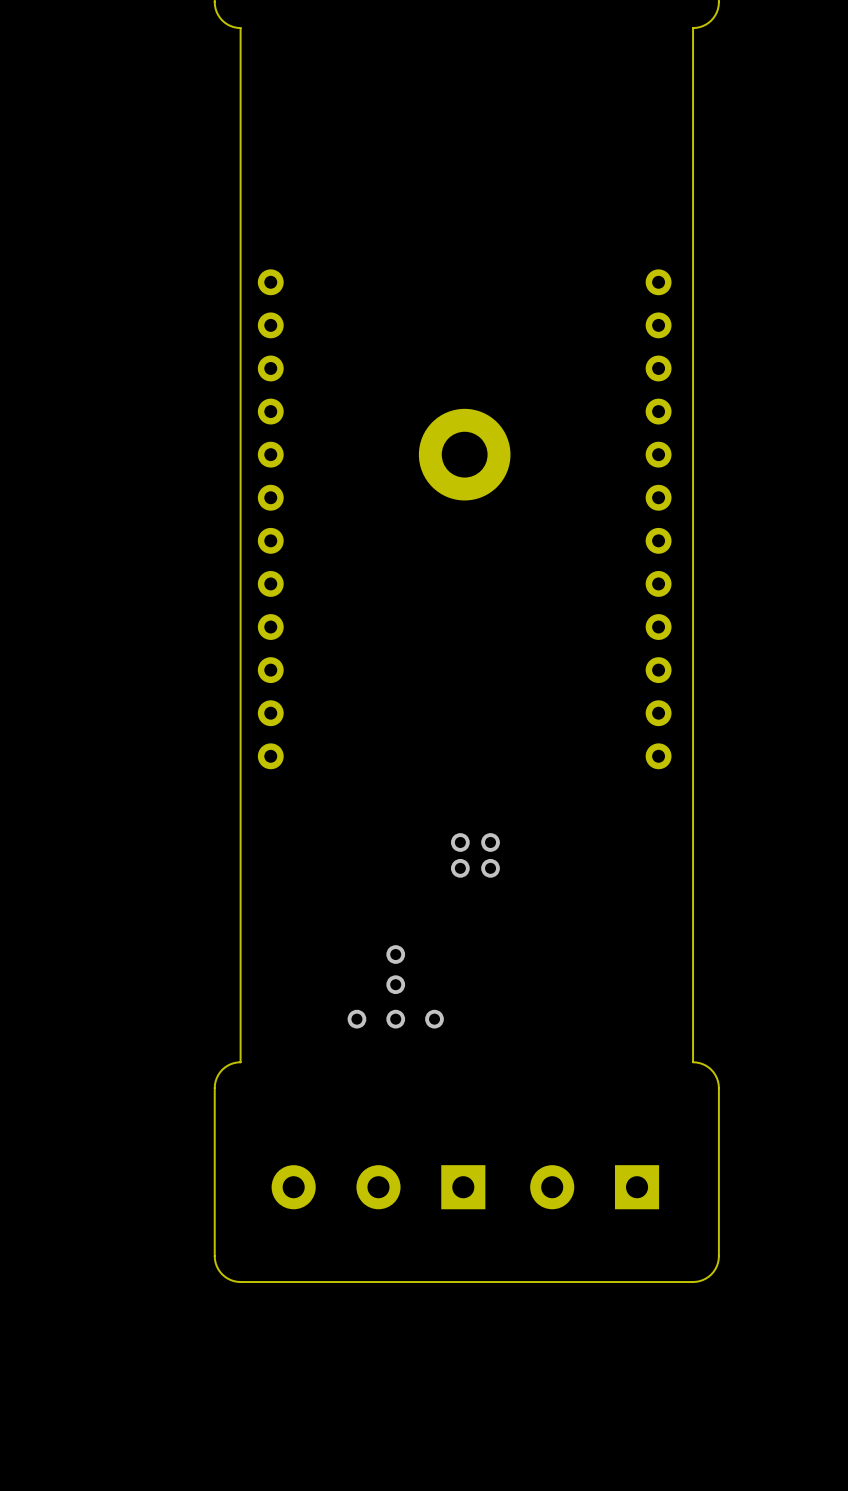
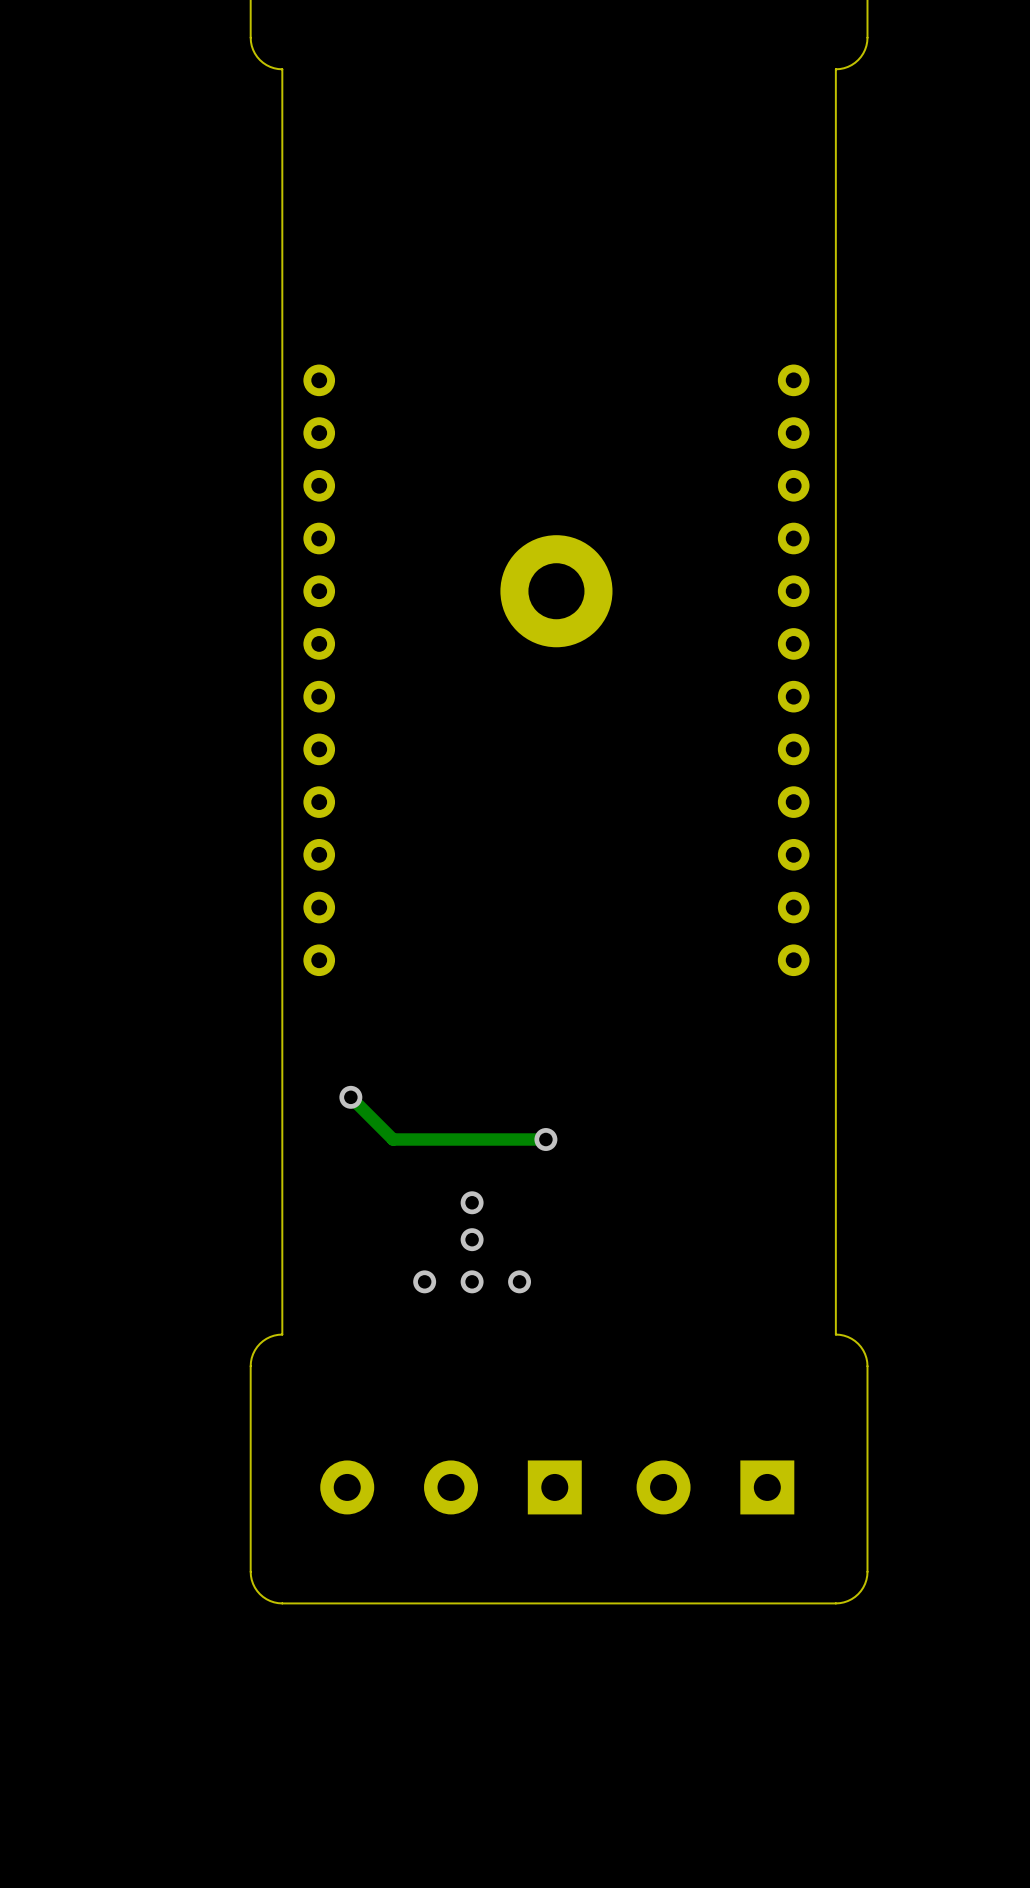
via: (460, 842) -> none
via: (490, 842) -> none
track: none -> (350, 1097) (393, 1139) (545, 1139)
via: none -> (350, 1097)
via: (460, 868) -> none
via: (490, 868) -> none
via: none -> (545, 1139)

